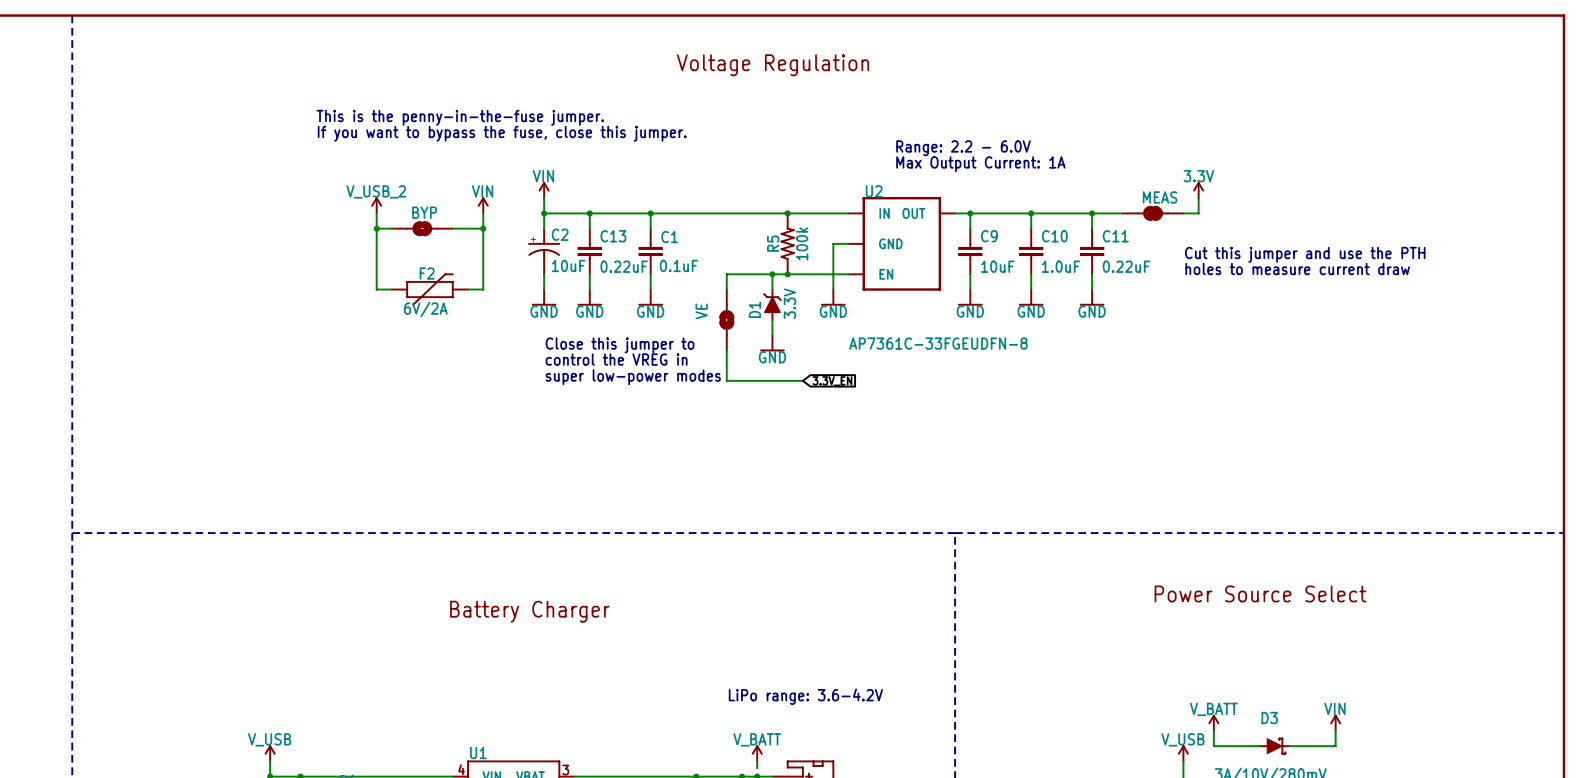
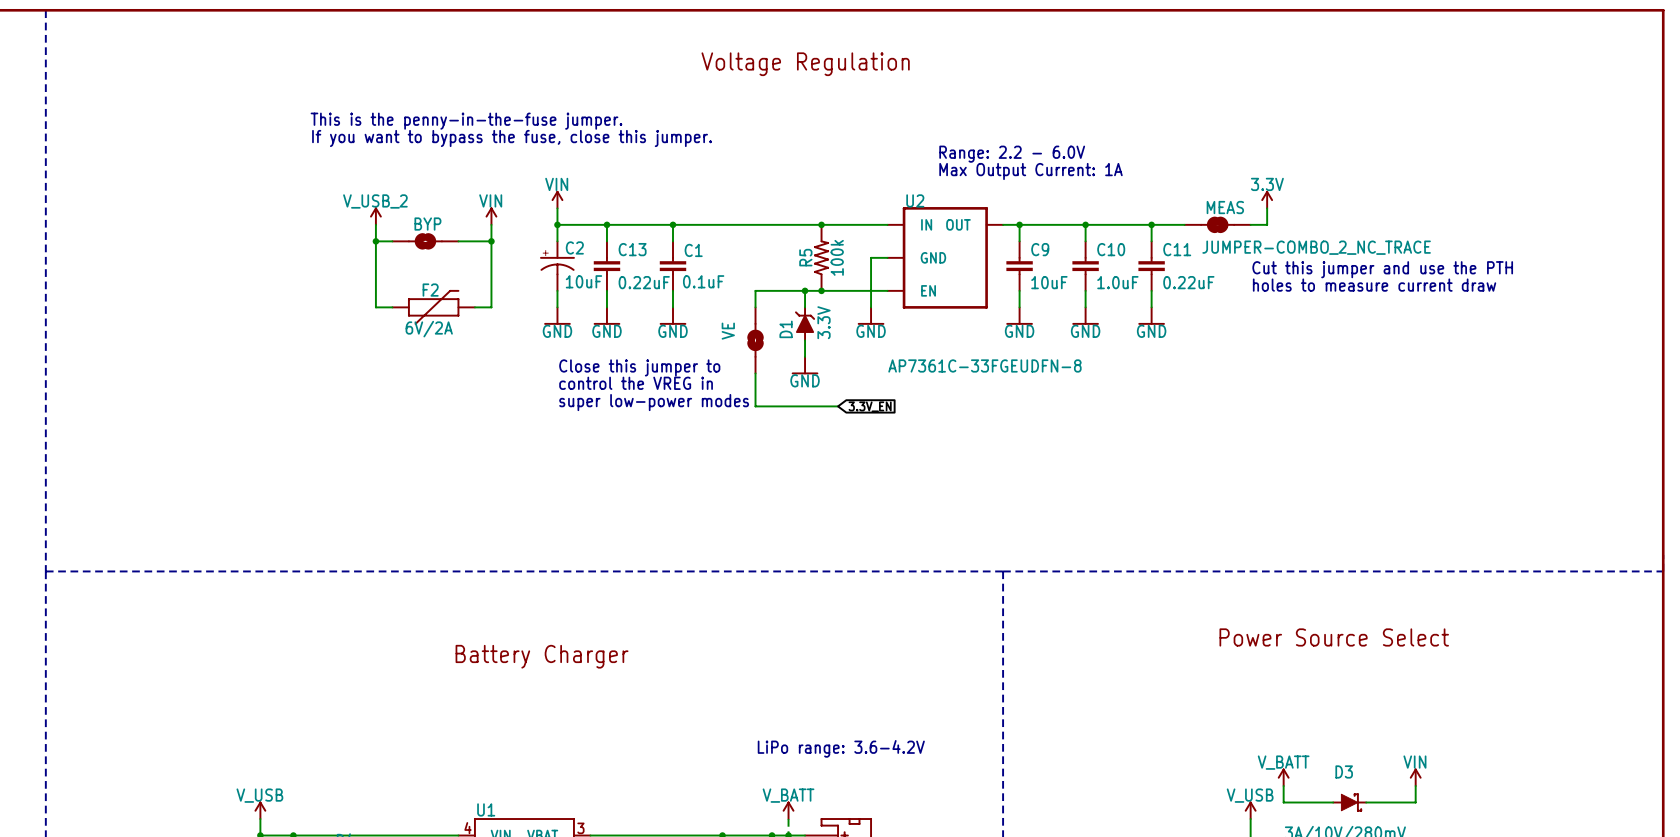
MEAS value: none -> JUMPER-COMBO_2_NC_TRACE (1316, 247)

